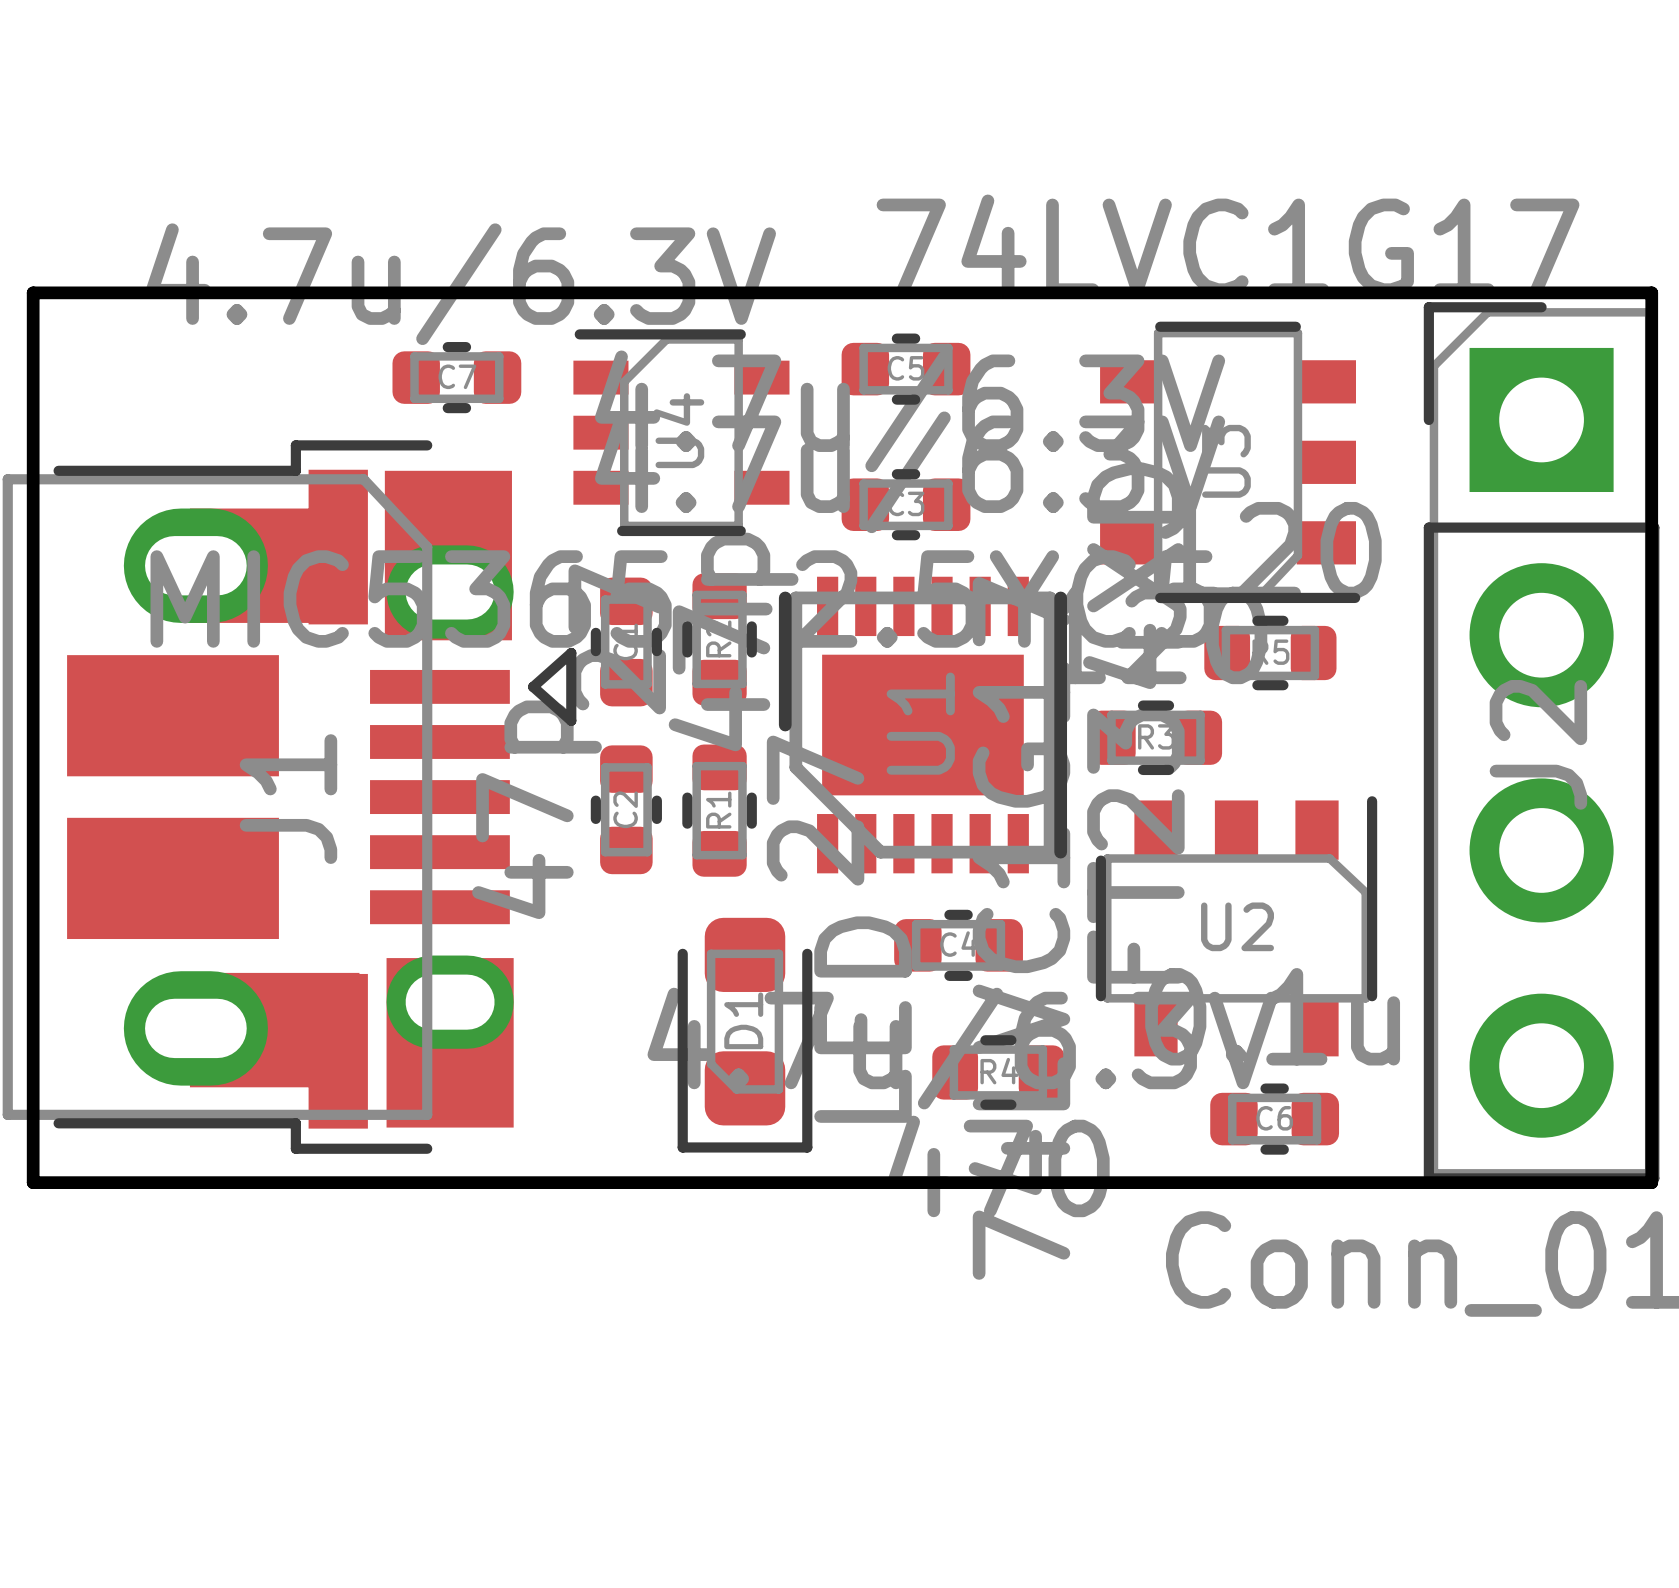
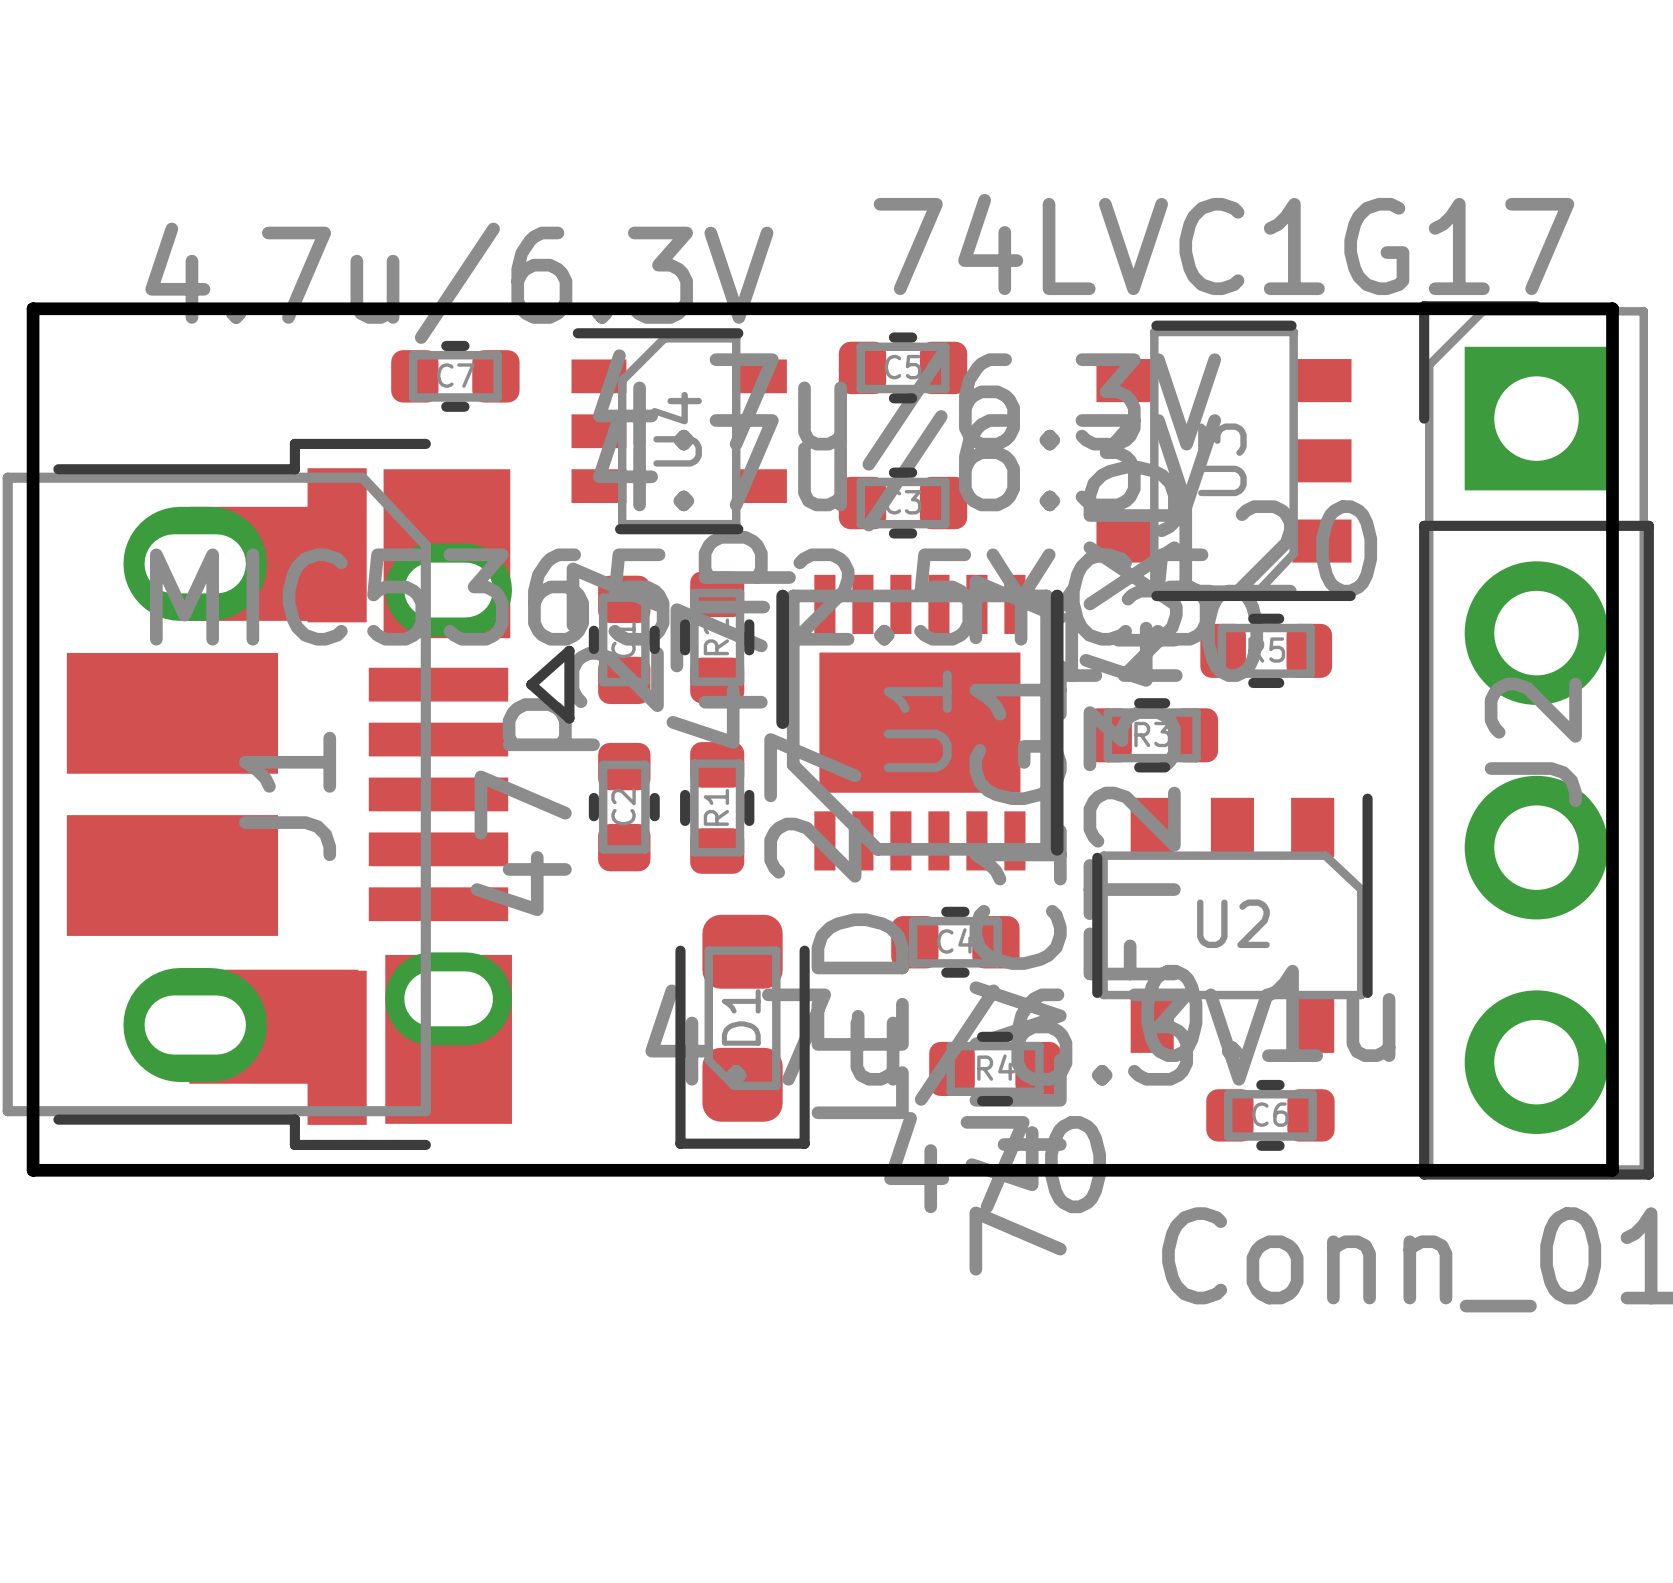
board edge: (33, 309) (33, 292) (1651, 292) (1651, 1182) (33, 1182) (33, 1174) -> (33, 308) (1612, 308) (1612, 1170) (33, 1170)

